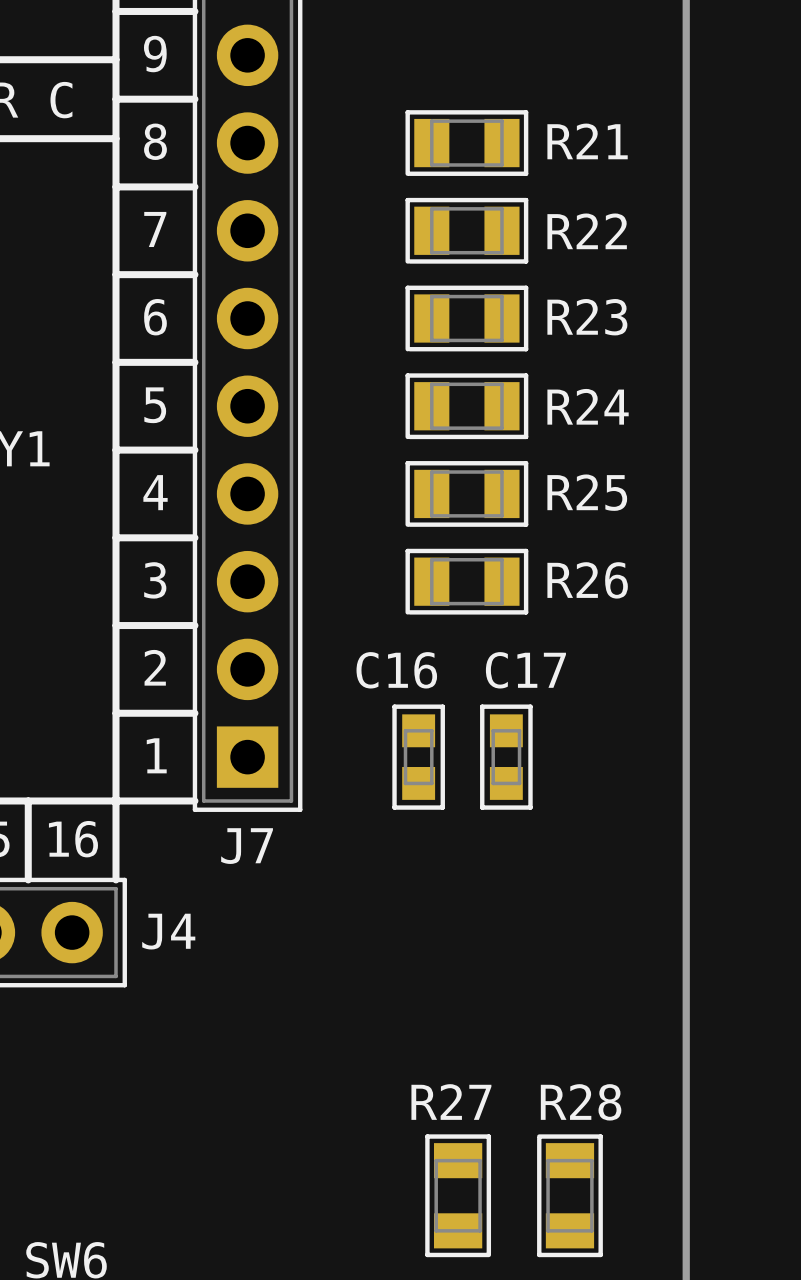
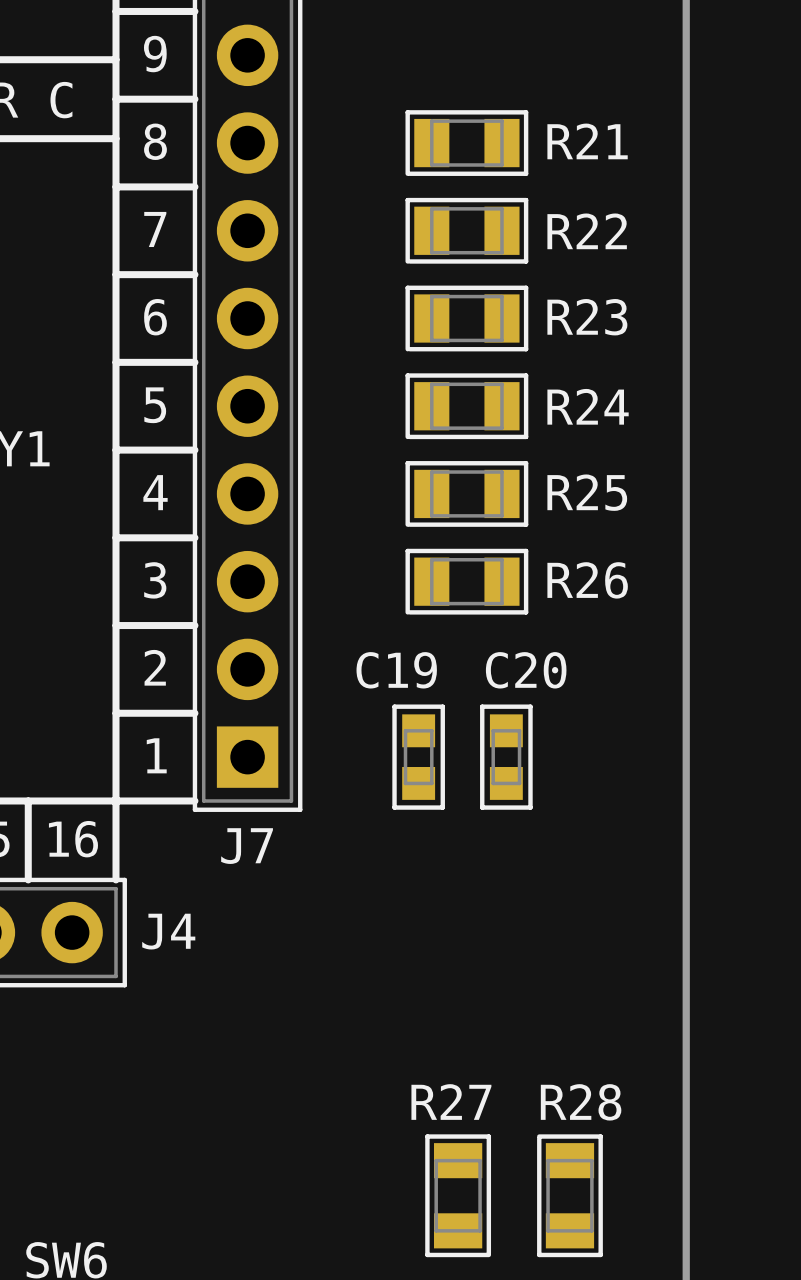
C16 name: C16 (396, 670) -> C19 (396, 670)
C17 name: C17 (525, 670) -> C20 (526, 670)

